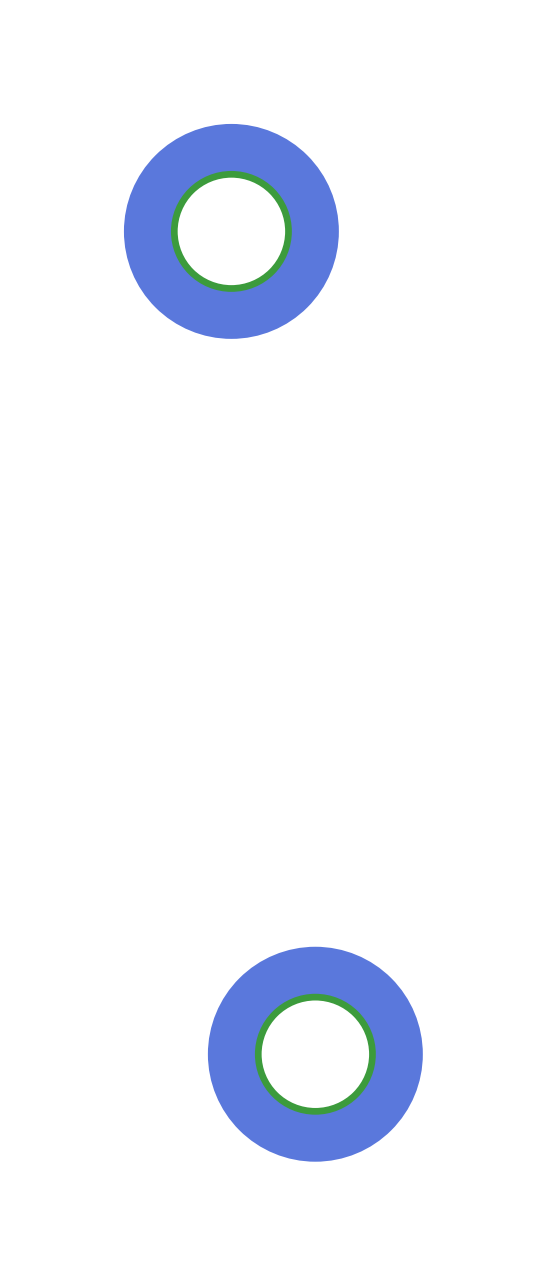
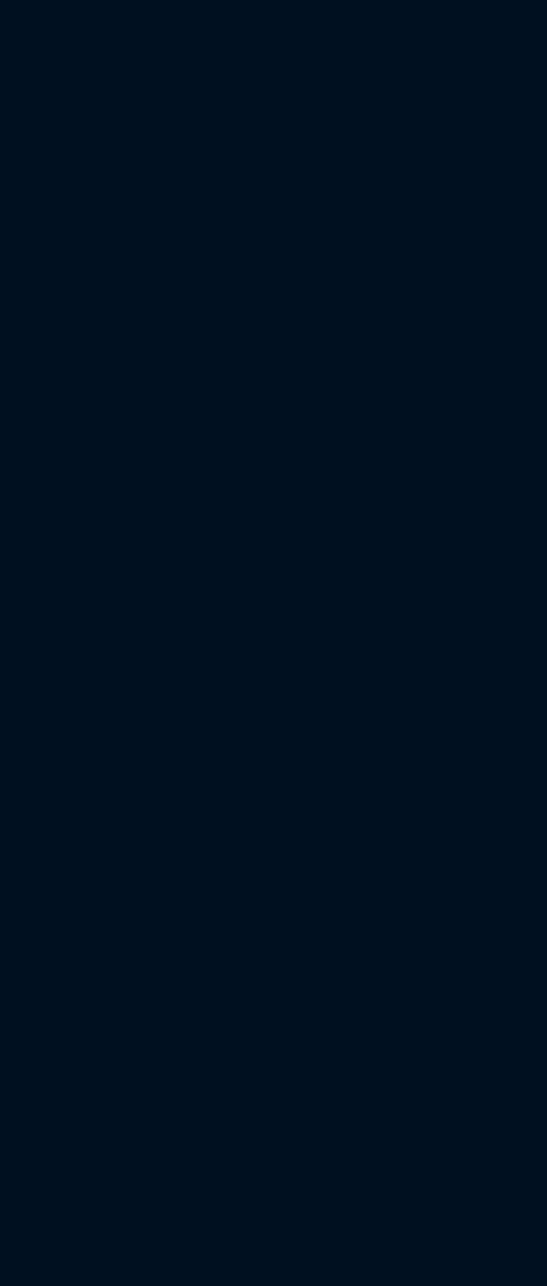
part: (231, 231) -> none
part: (315, 1054) -> none

